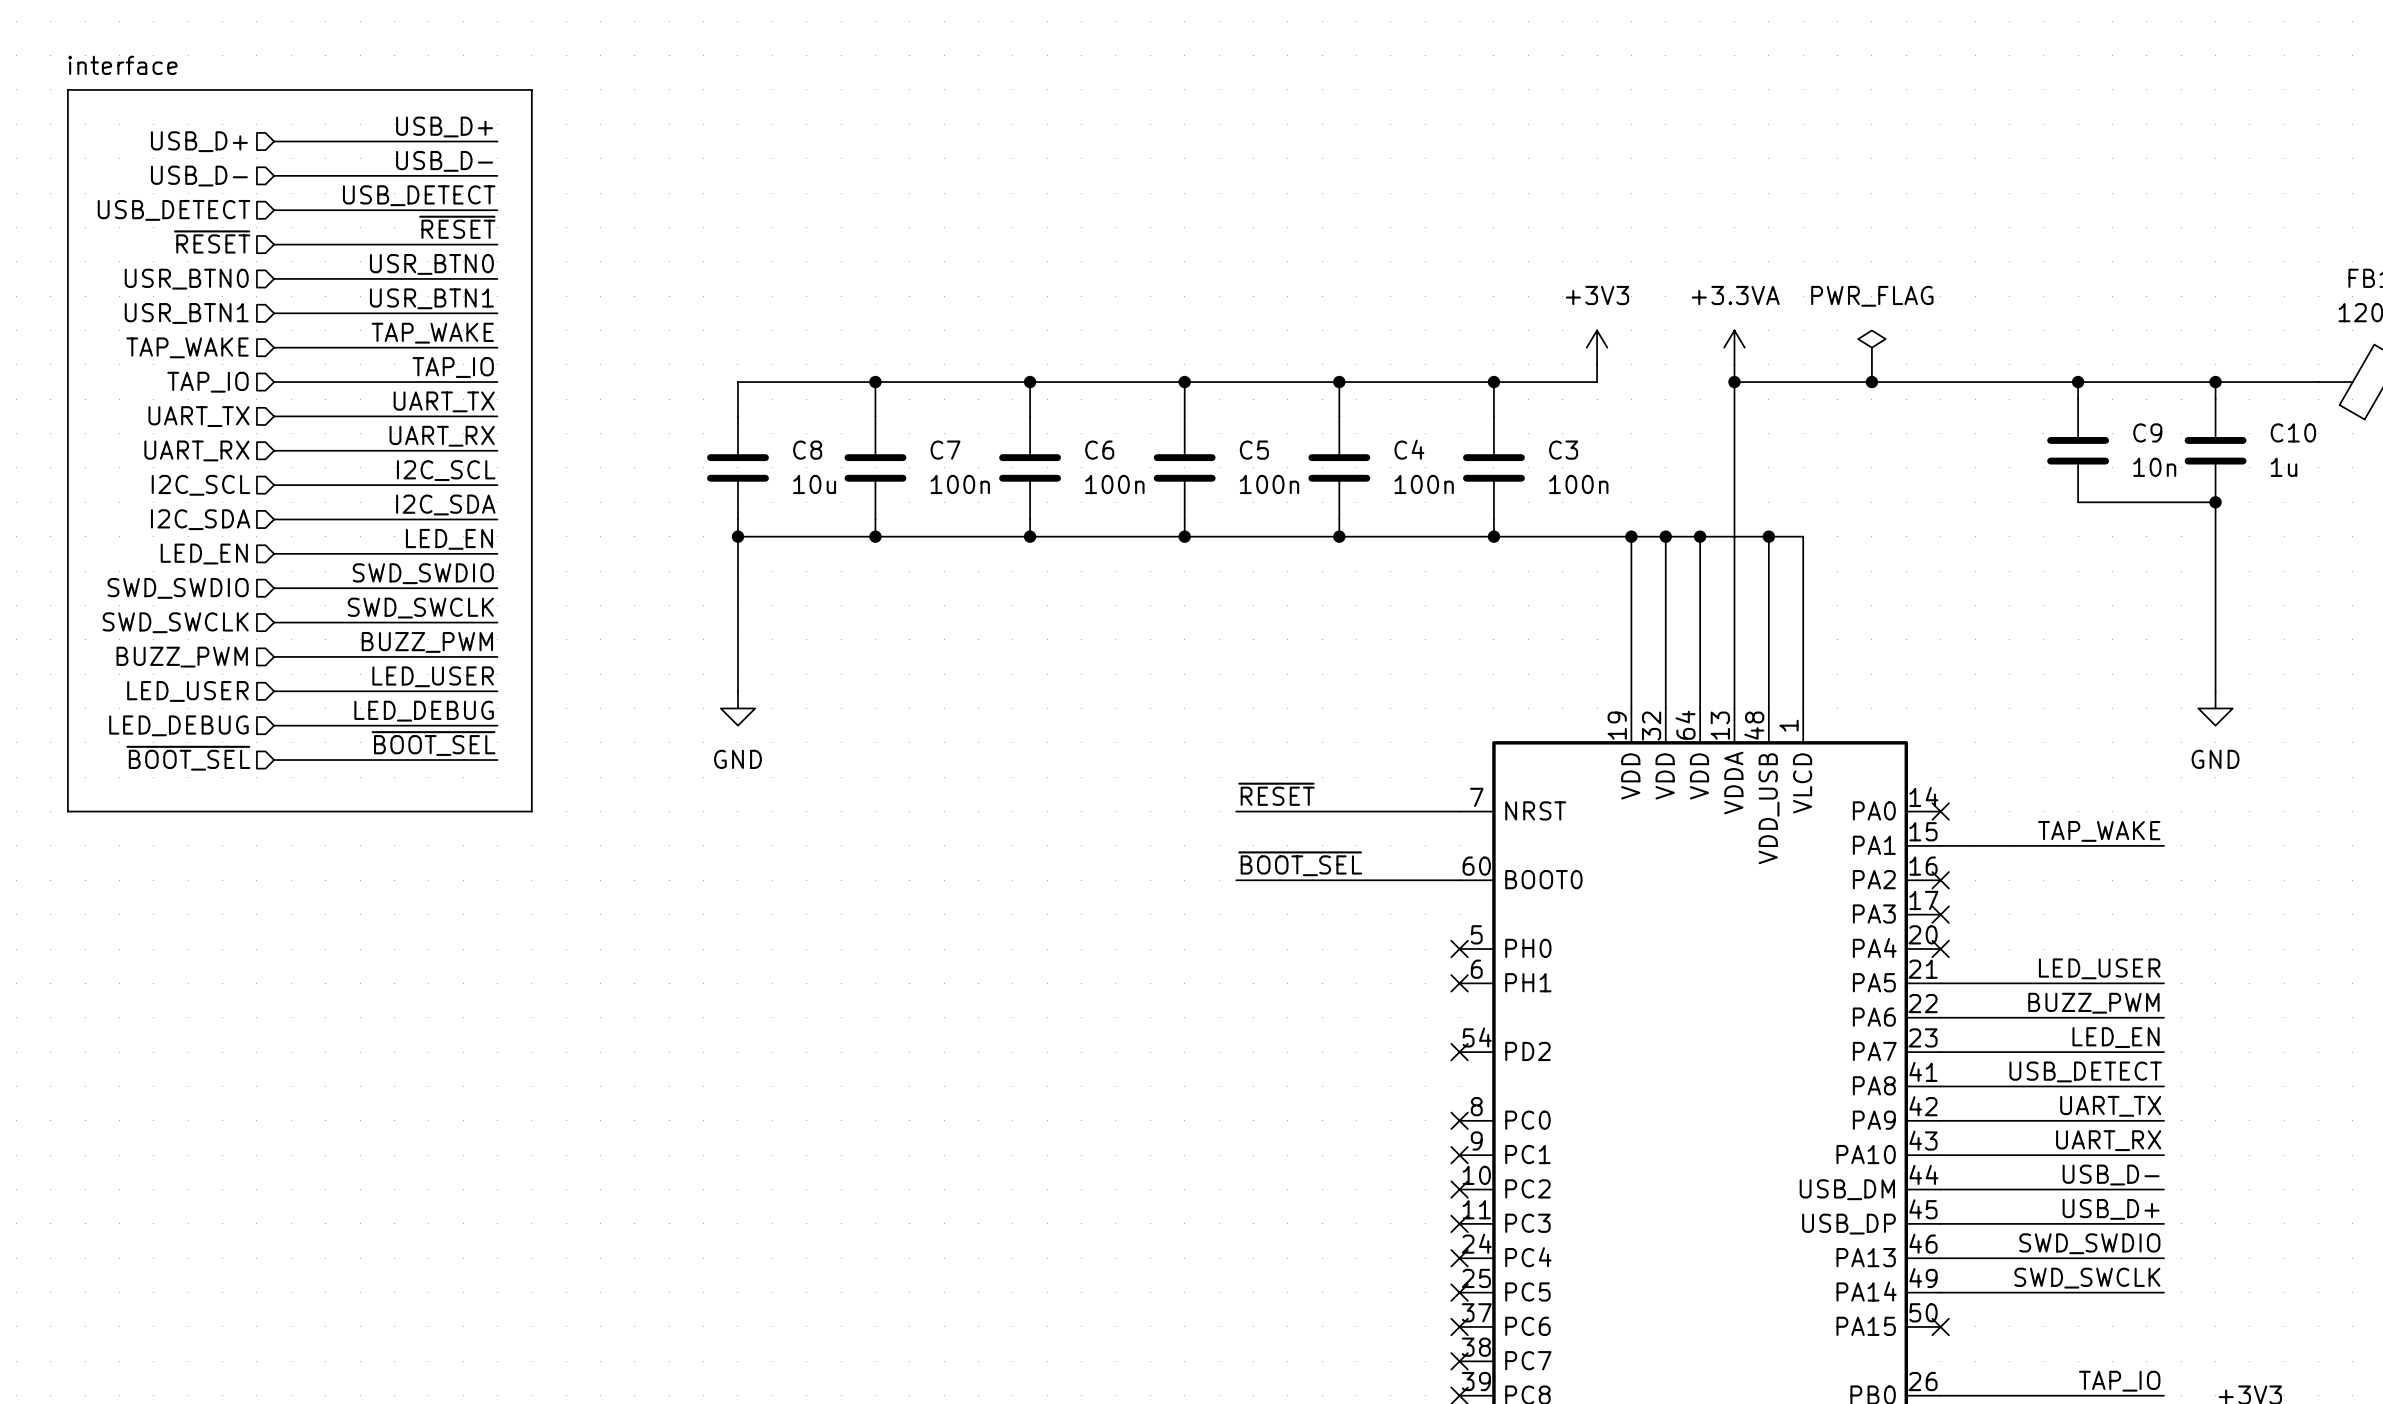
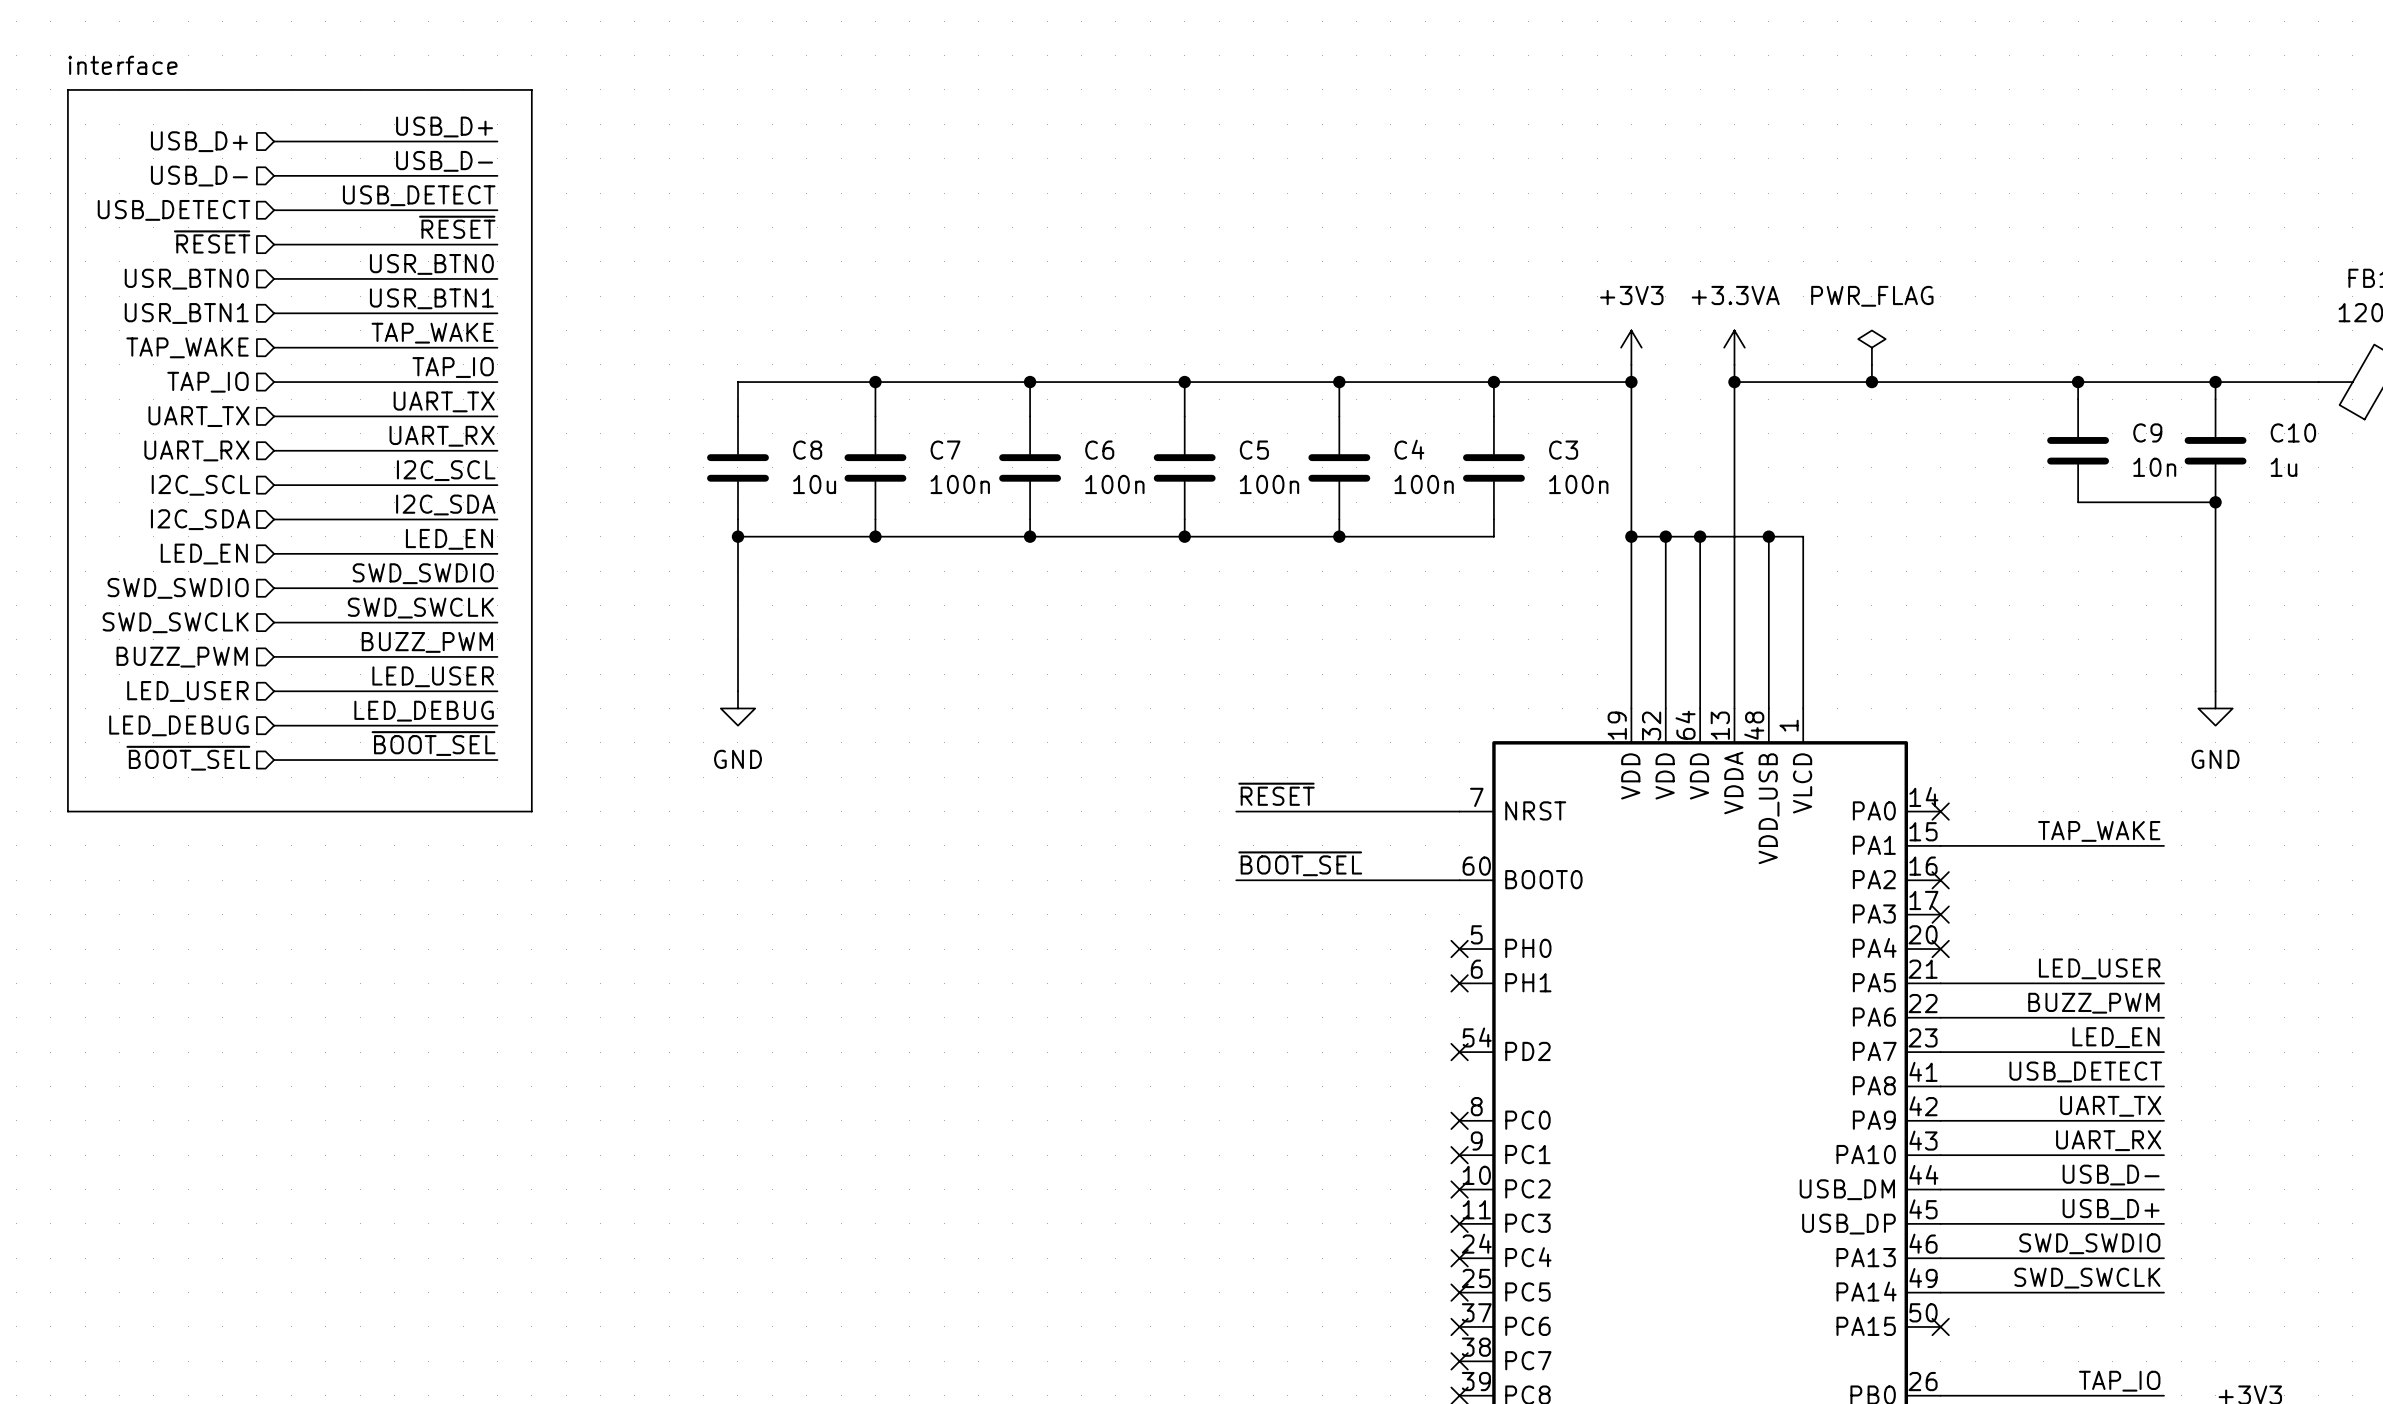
power symbol position: +3V3 (1597, 347) -> +3V3 (1631, 347)
wire: (1597, 364) (1597, 382) -> (1631, 382) (1597, 382)
junction: none -> (1631, 382)
wire: (1493, 536) (1631, 536) -> (1631, 364) (1631, 536)
junction: (1493, 536) -> none

